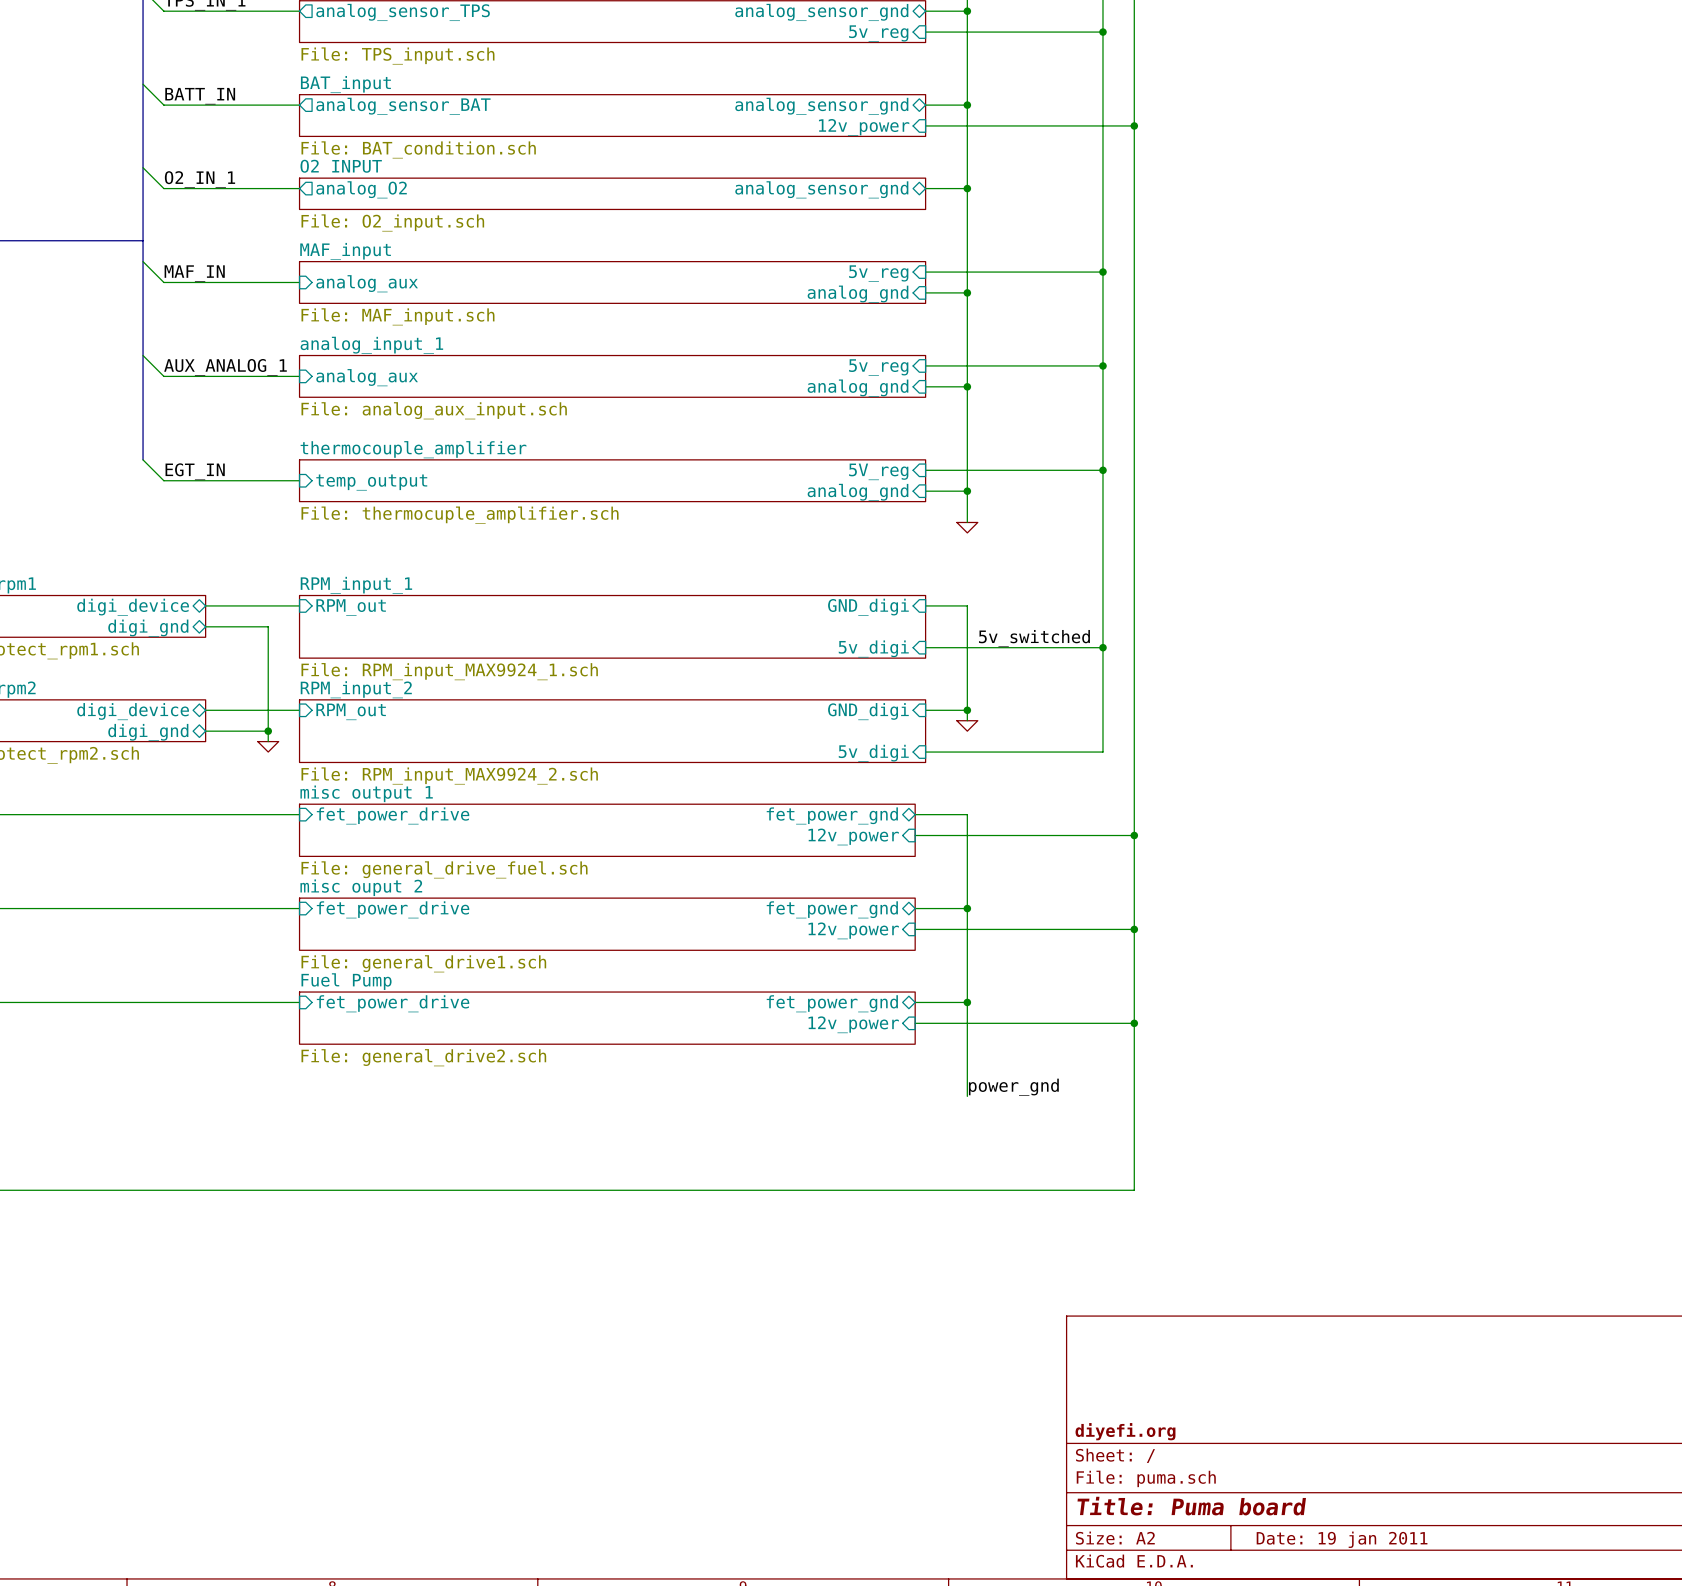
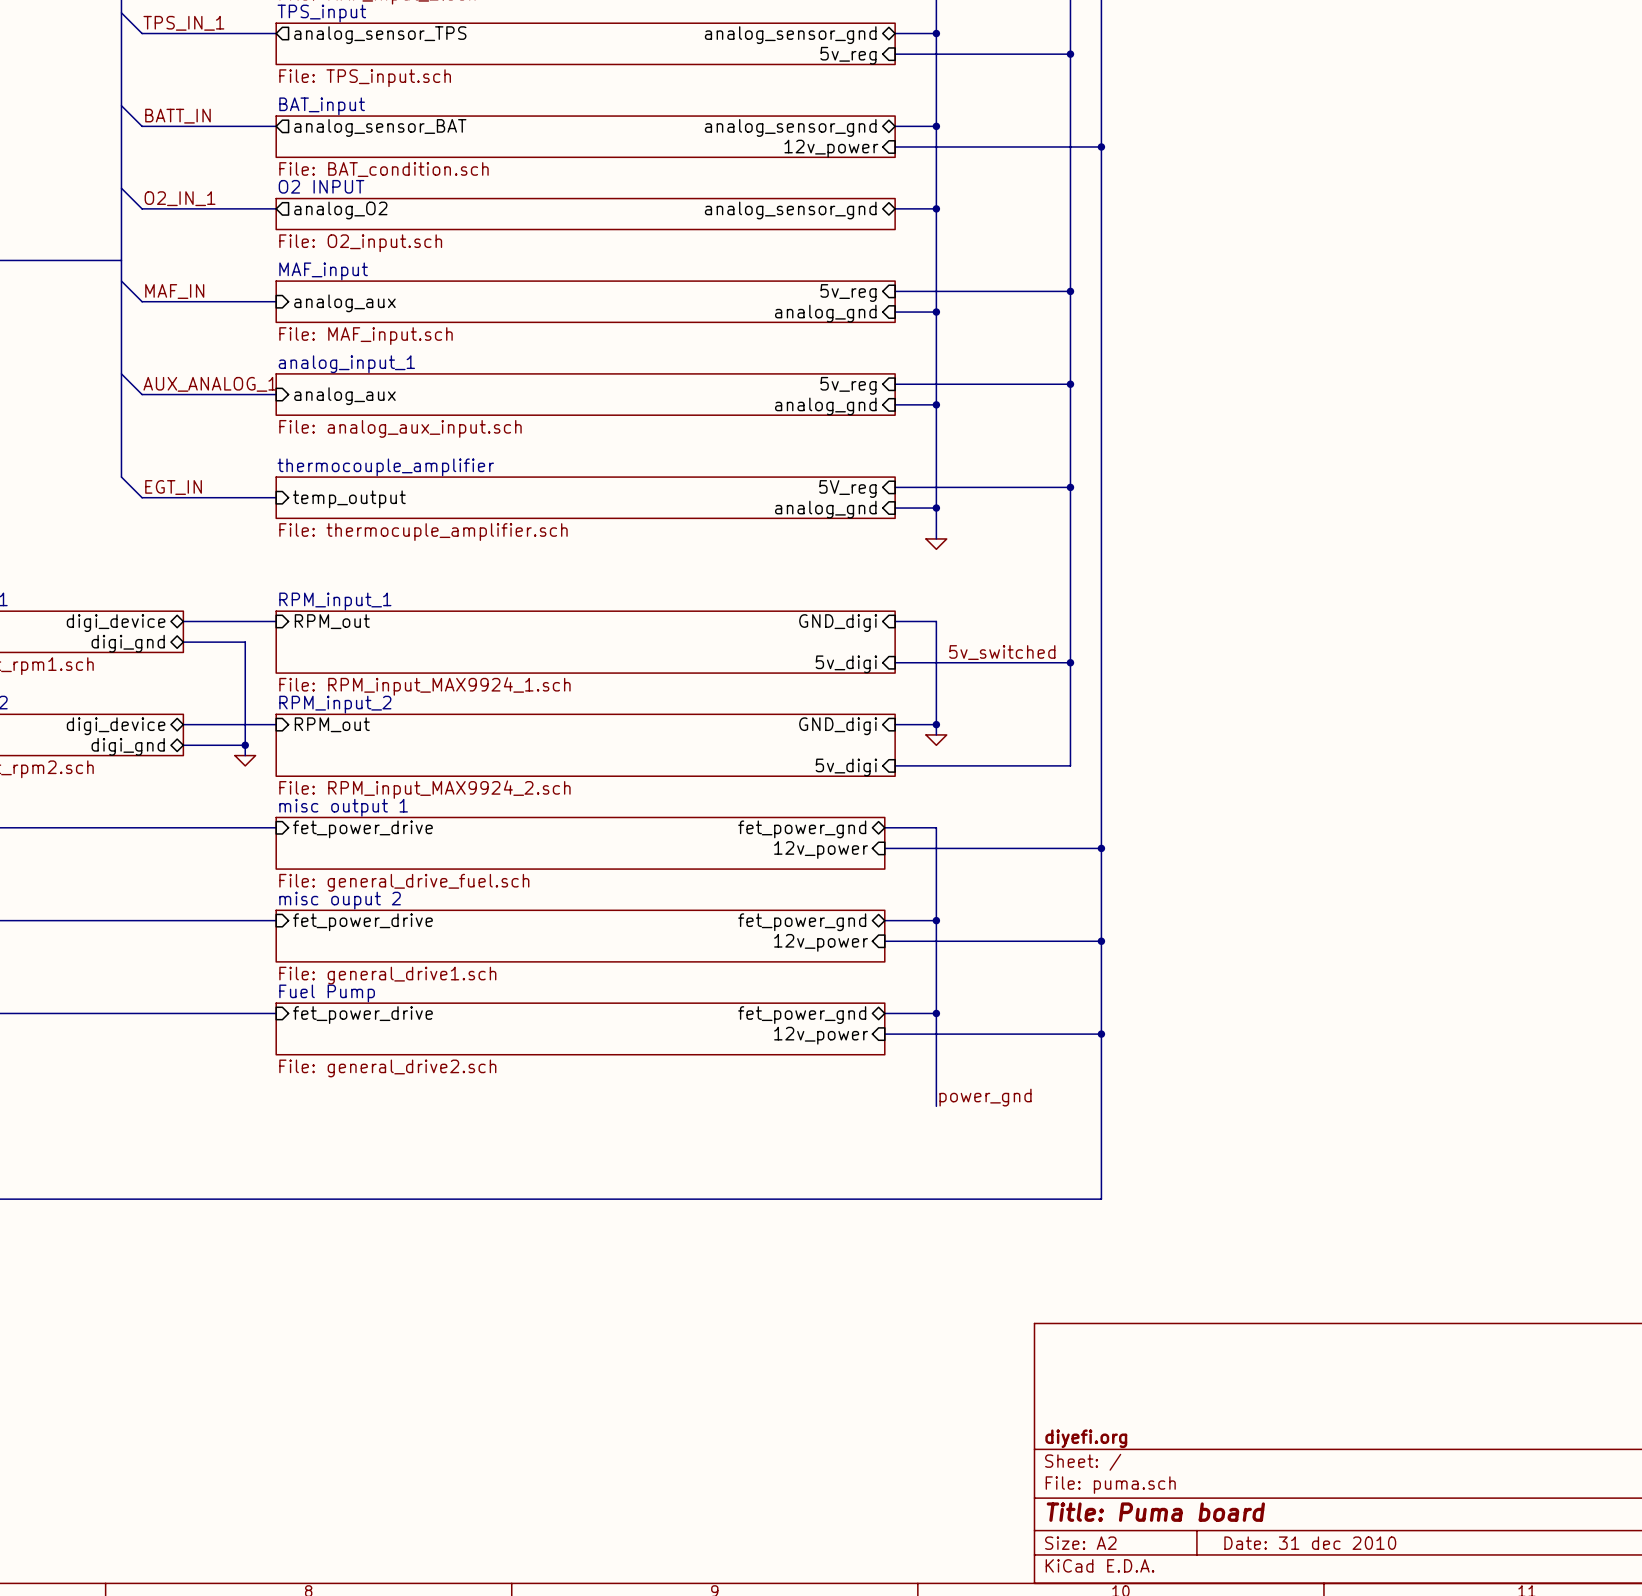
title block: Date: 19 jan 2011 (1342, 1539) -> Date: 31 dec 2010 (1310, 1543)

